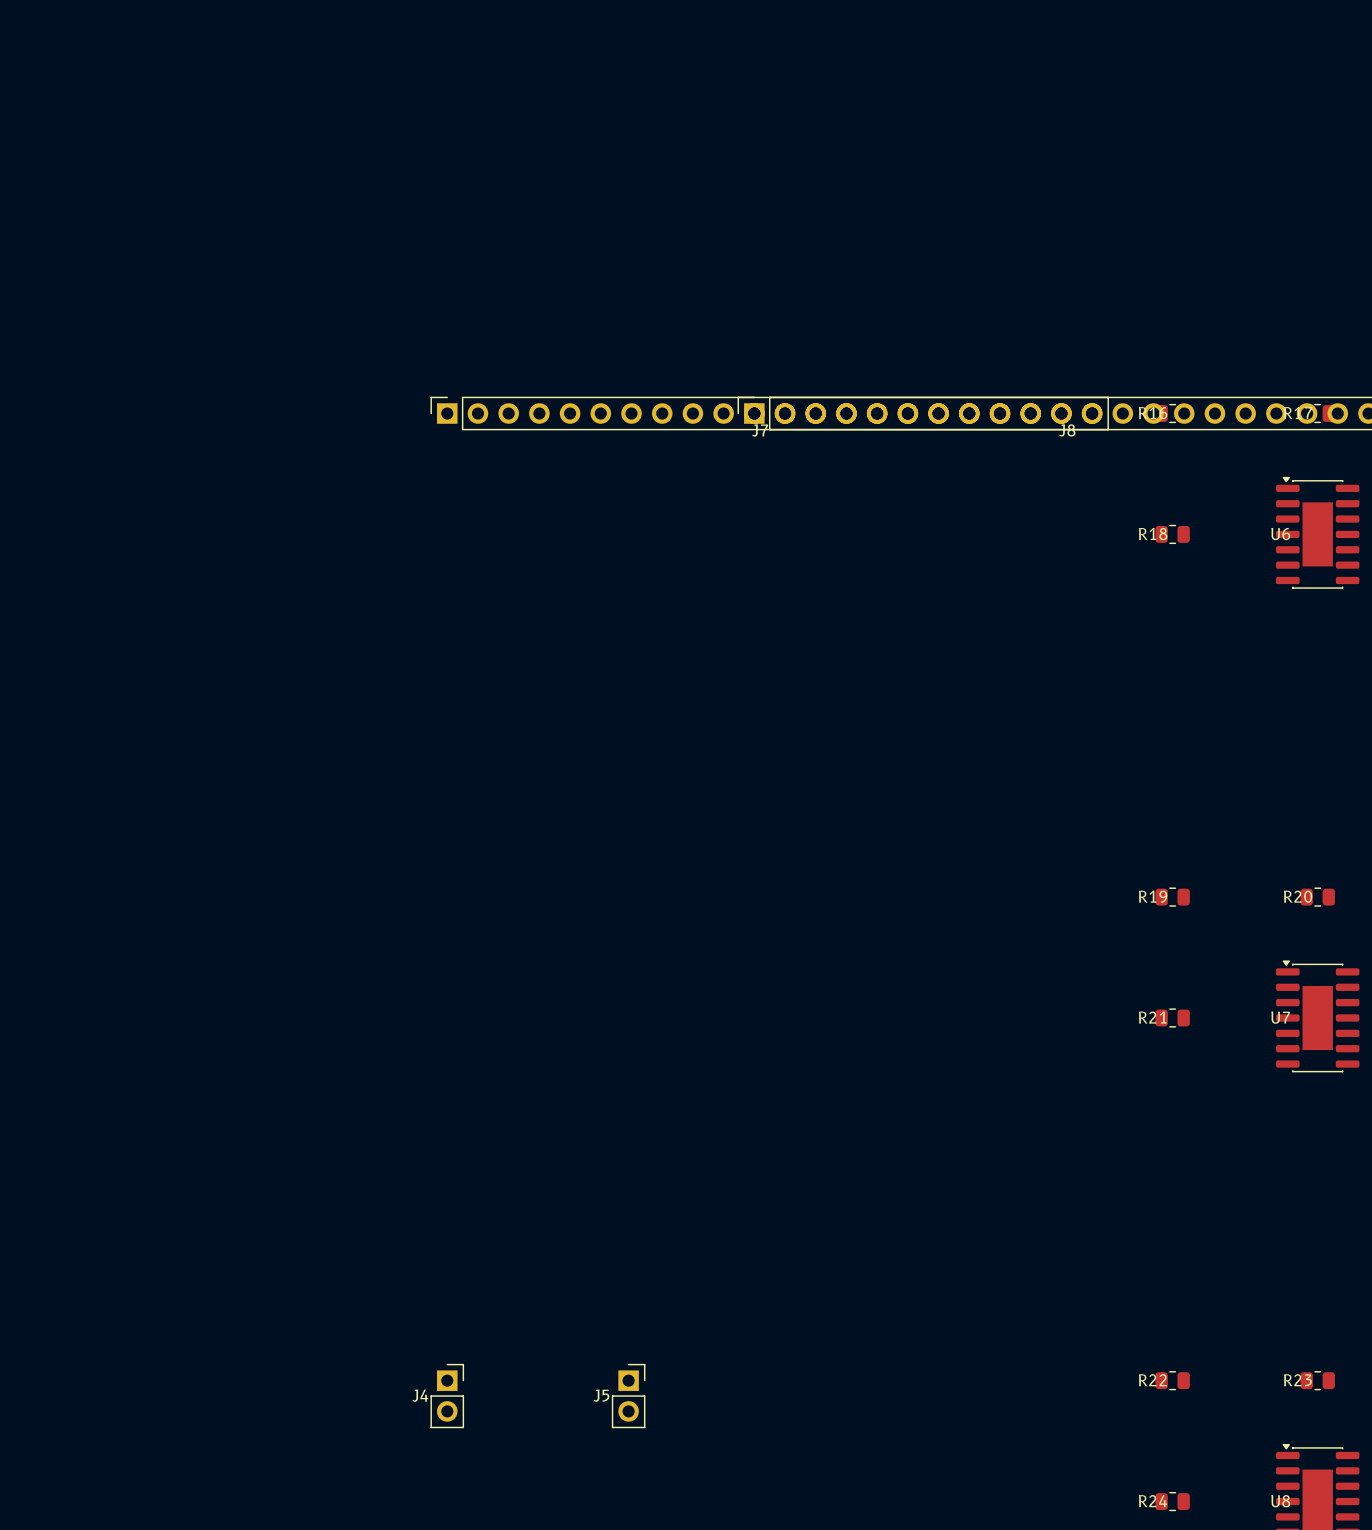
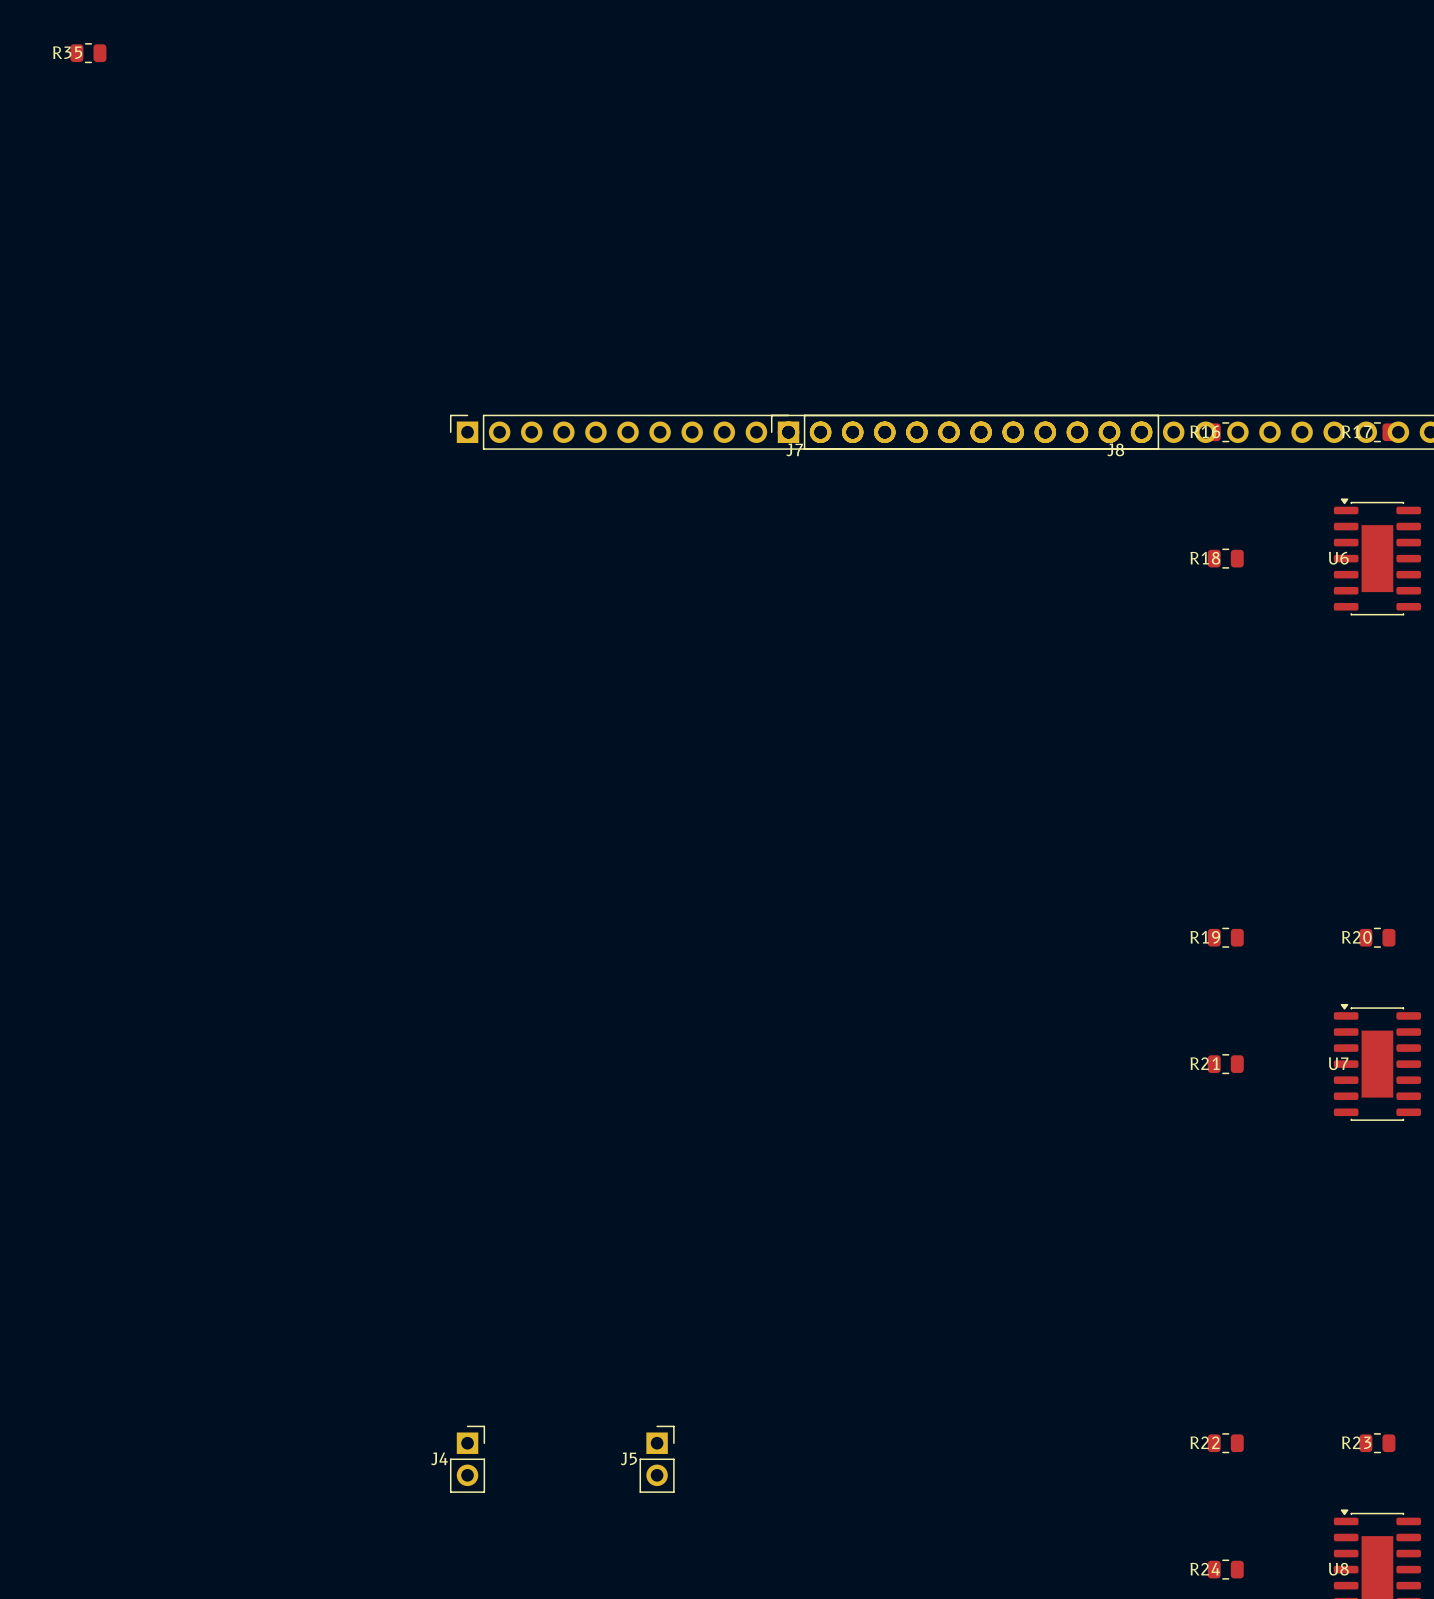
R35: none -> (88, 53)

